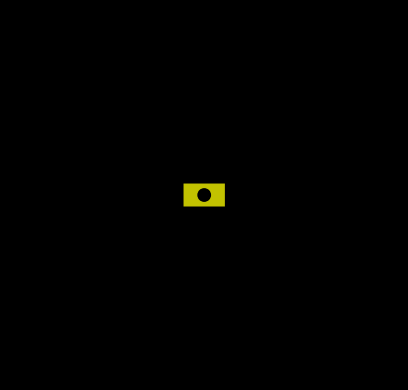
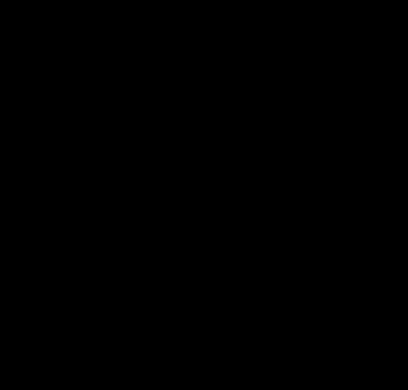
part: (204, 195) -> none

